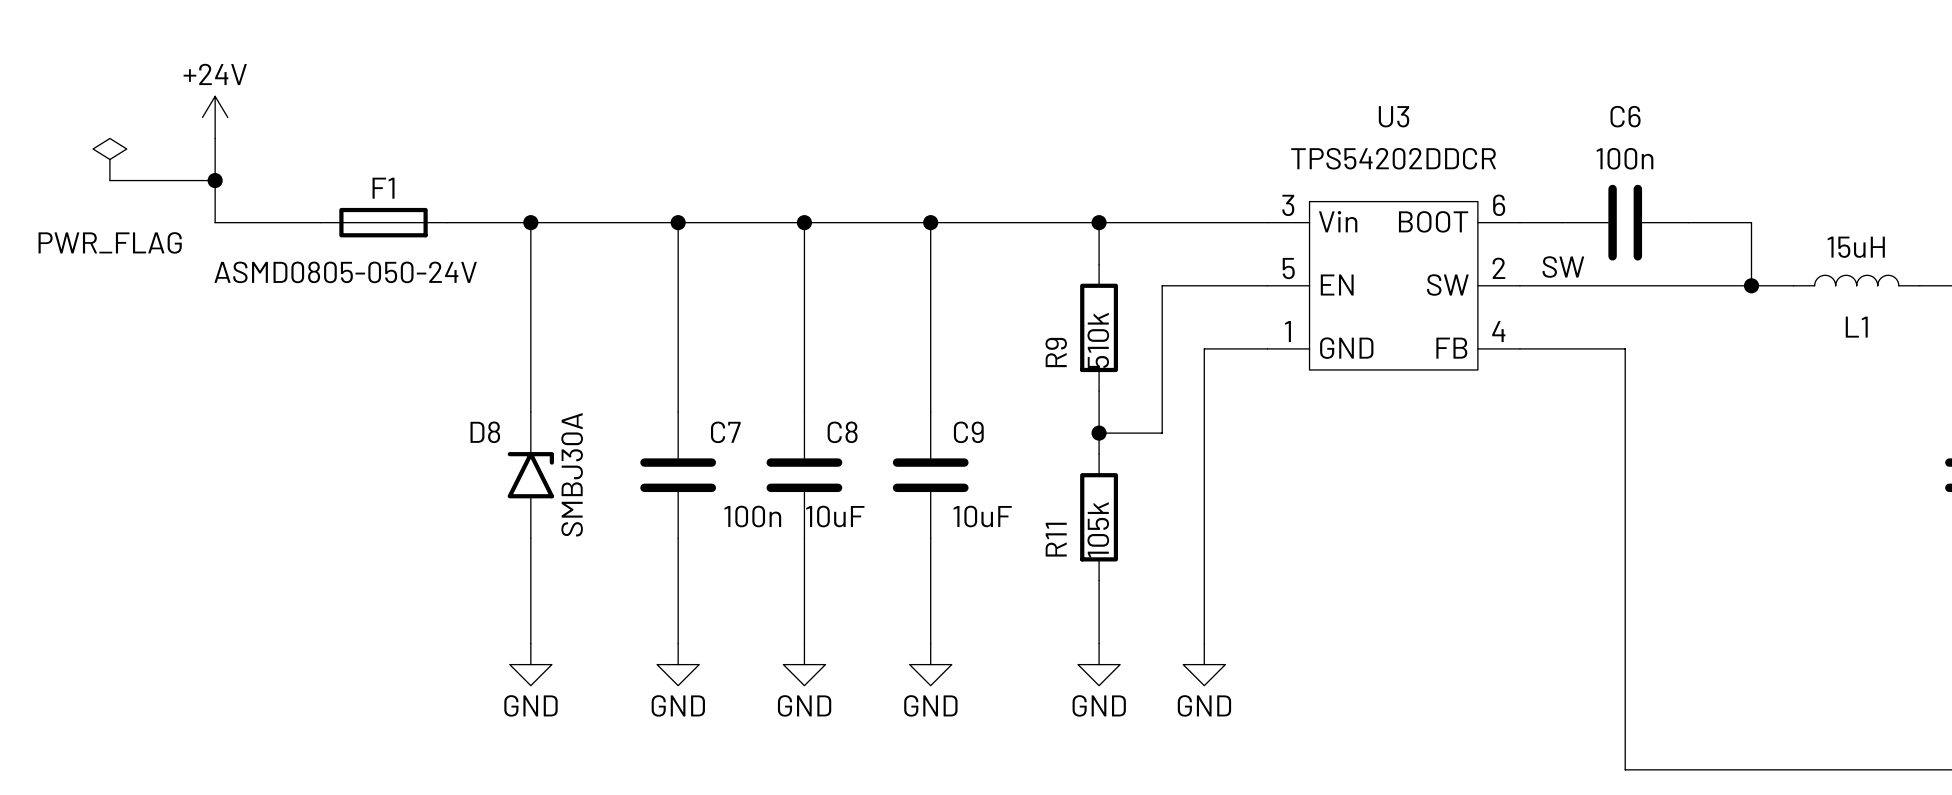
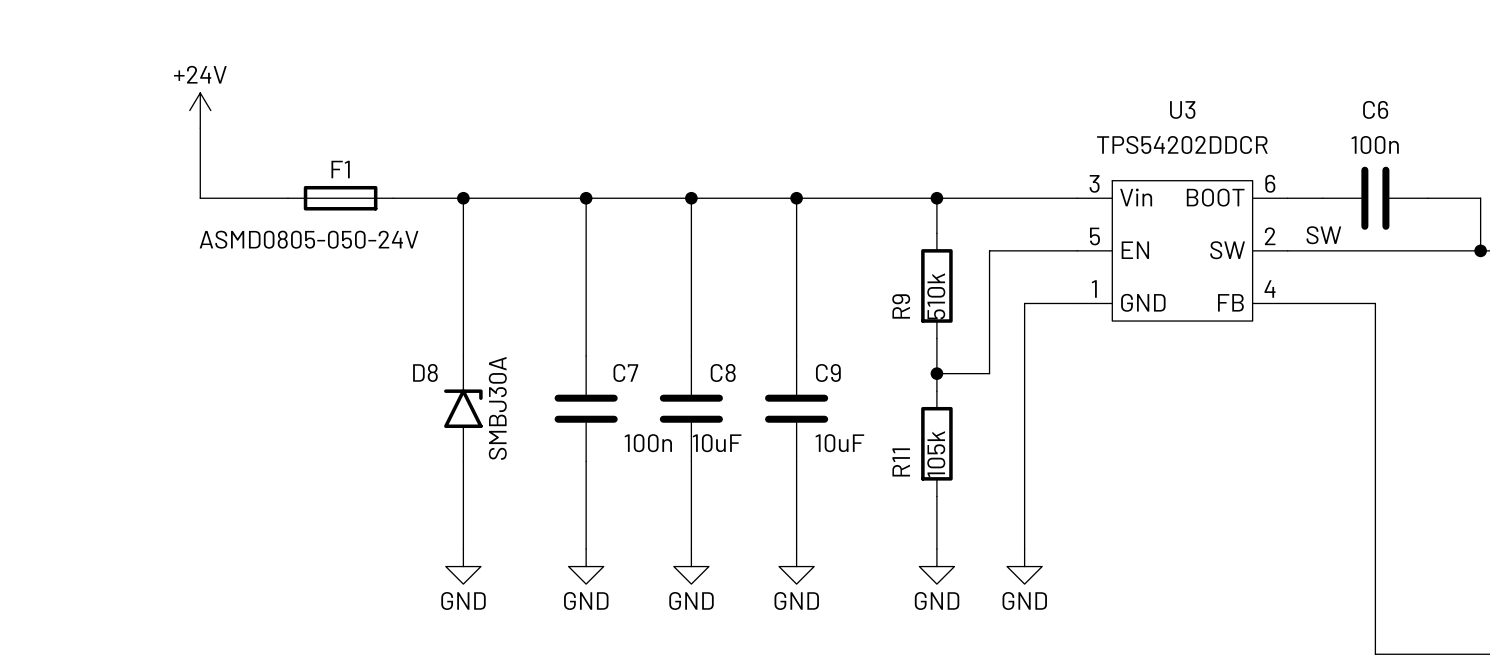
power symbol: PWR_FLAG (109, 159) -> none
wire: (109, 180) (215, 180) -> none
junction: (215, 180) -> none

